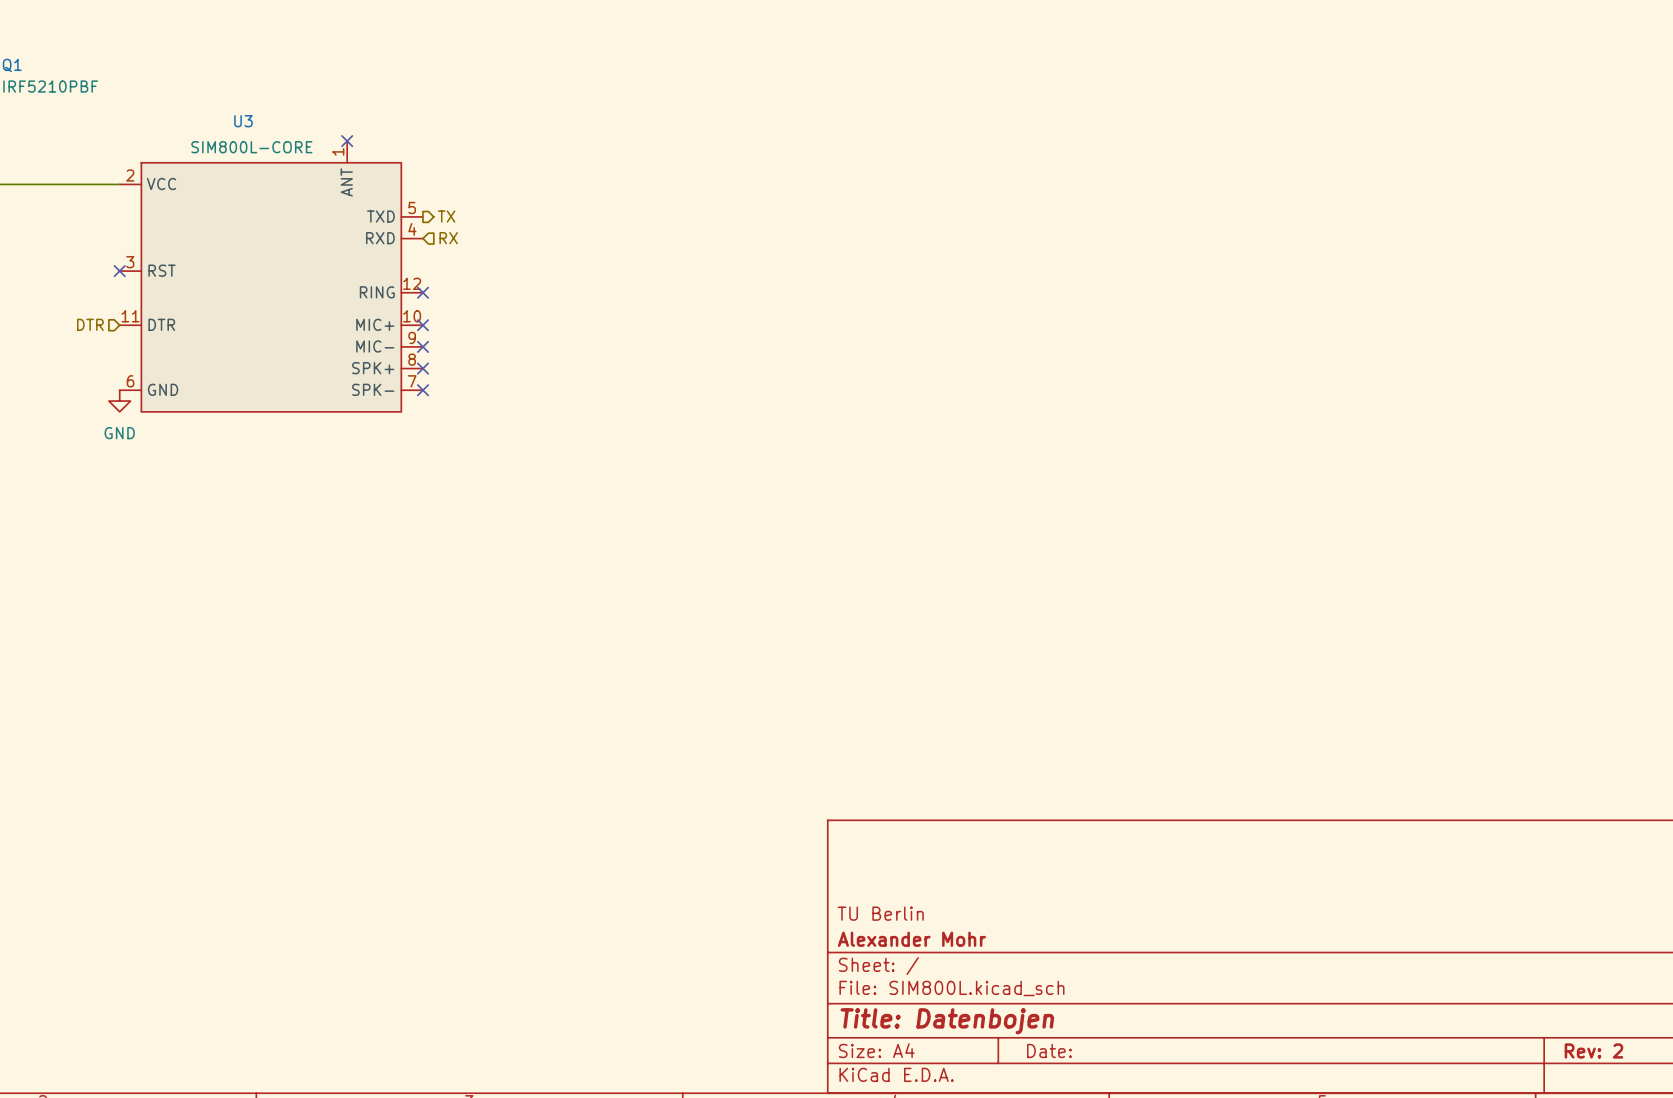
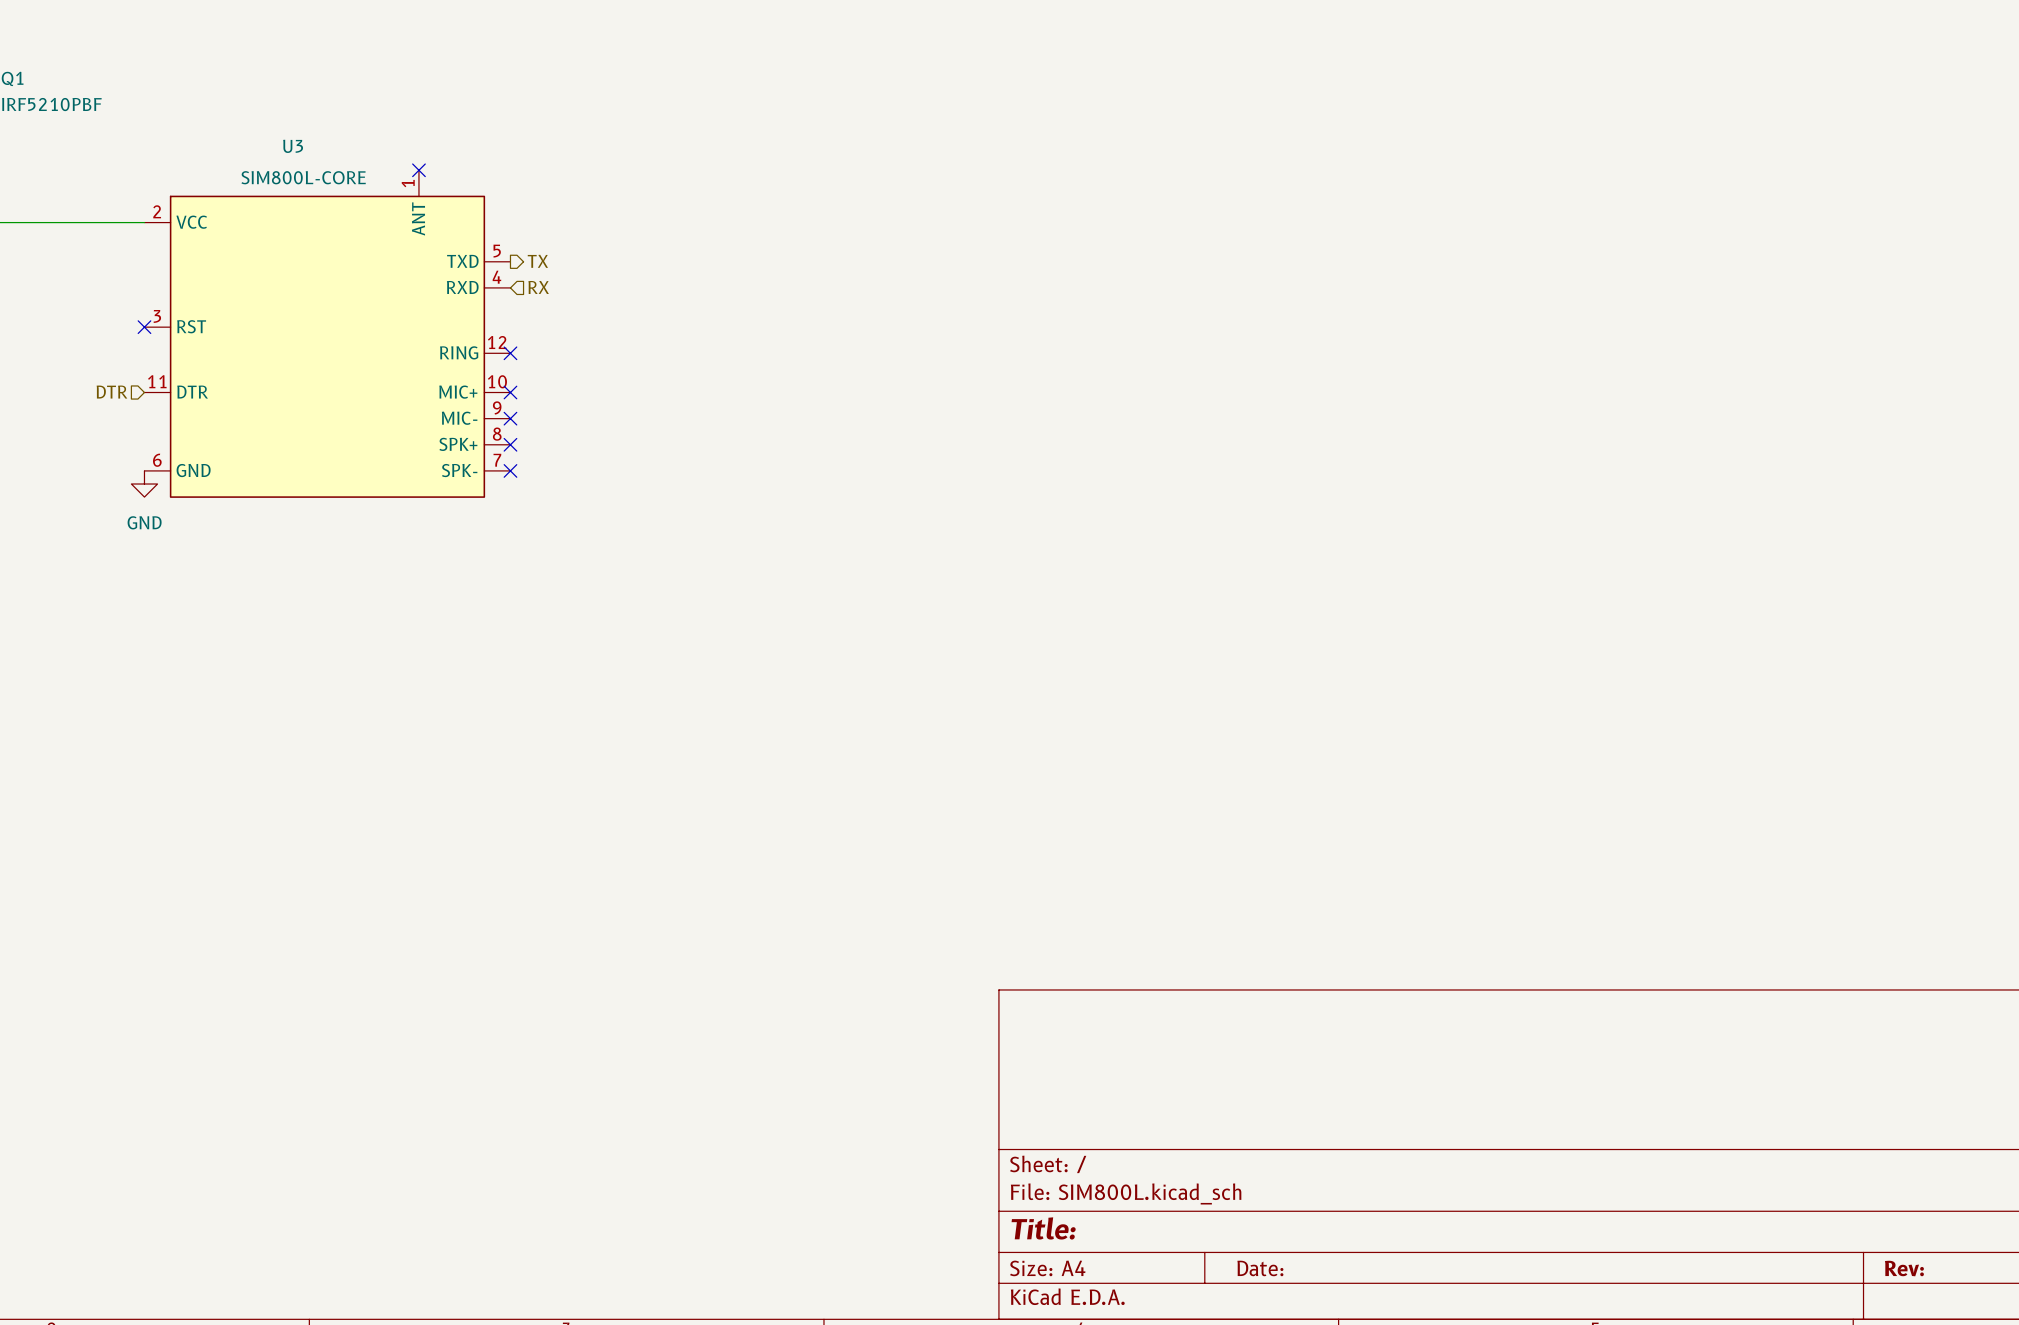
title block: TU Berlin (880, 913) -> none
title block: Alexander Mohr (911, 939) -> none
title block: Title: Datenbojen (947, 1021) -> Title: (1043, 1228)
title block: Rev: 2 (1593, 1050) -> Rev: (1904, 1268)

